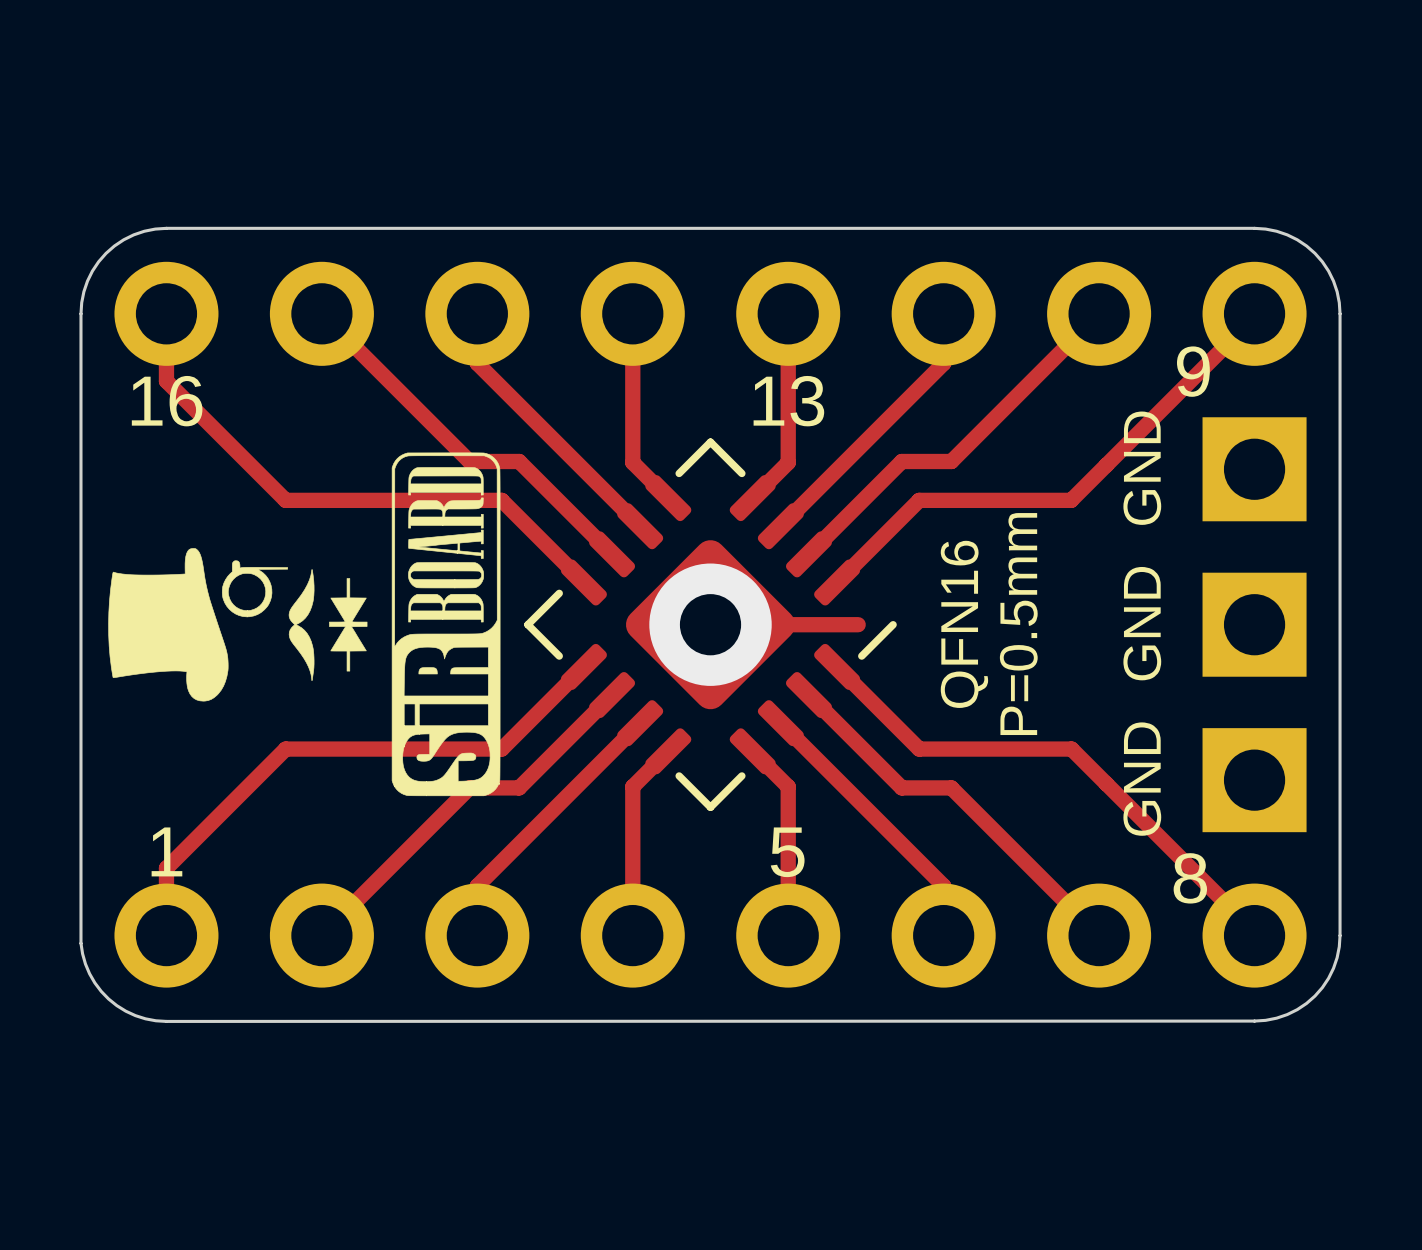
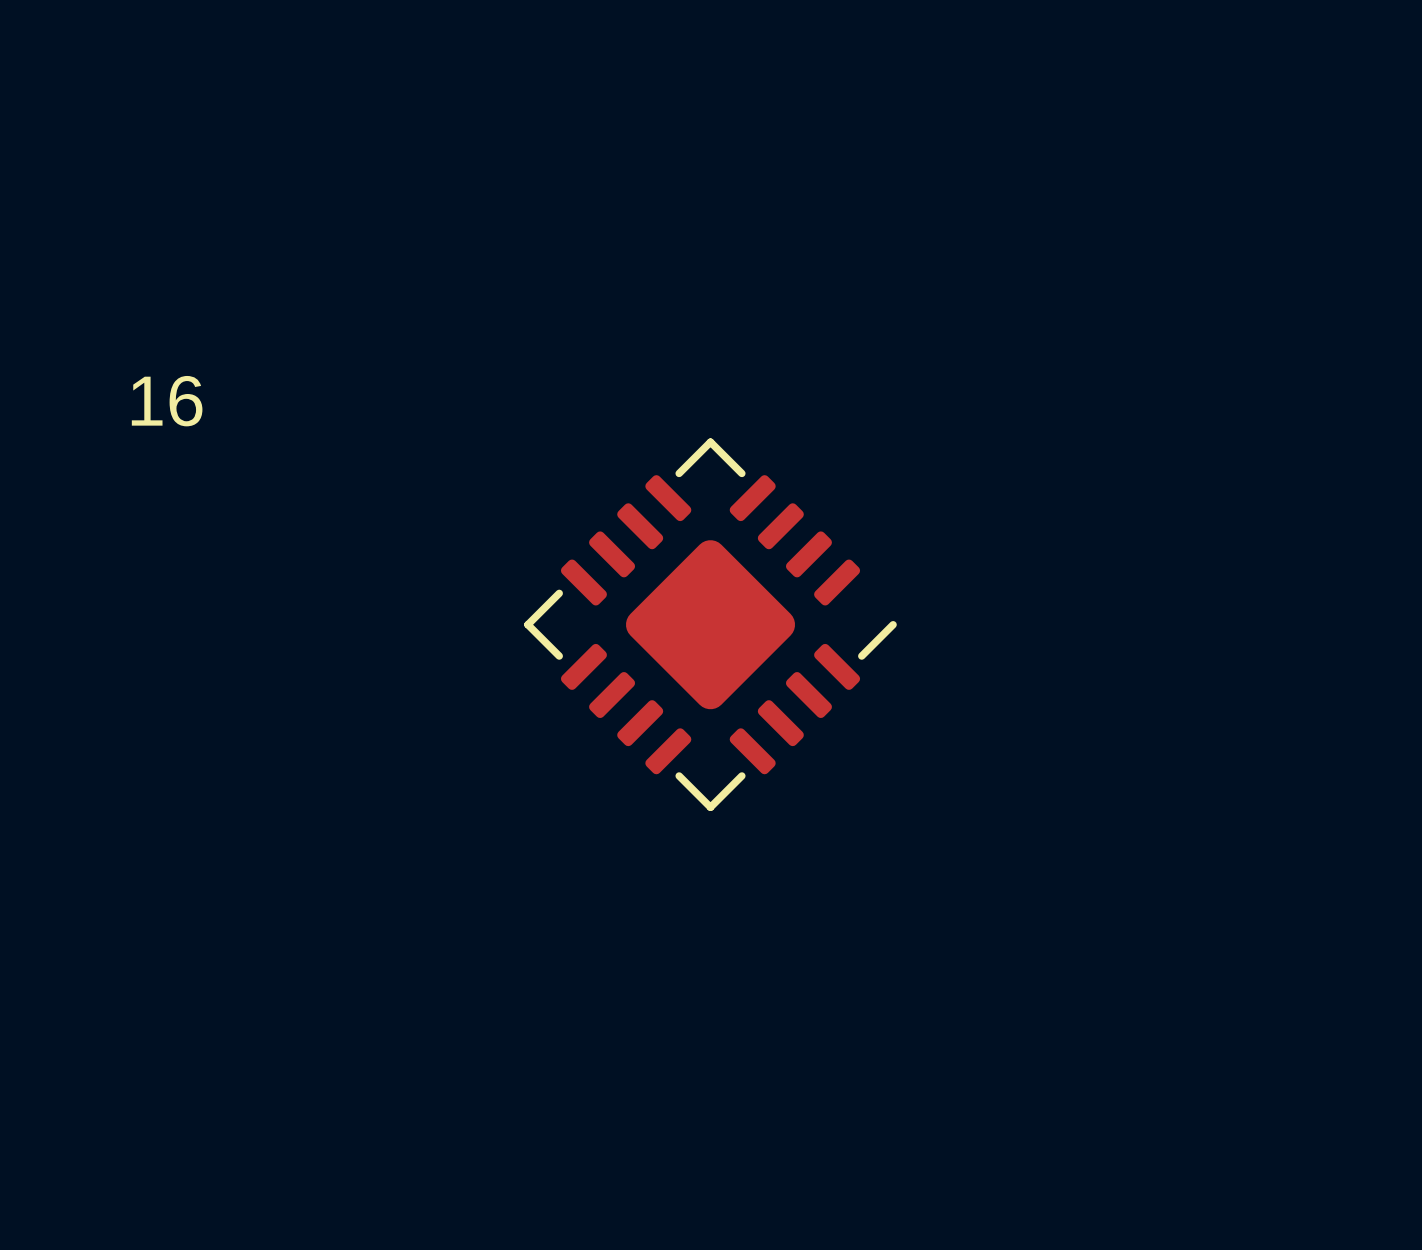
board edge: (166, 228) (1254, 228) (1276, 231) (1297, 239) (1315, 253) (1328, 271) (1337, 291) (1340, 313) (1340, 935) (1337, 957) (1328, 978) (1315, 996) (1297, 1009) (1276, 1018) (1254, 1021) (166, 1021) (135, 1015) (116, 1005) (101, 991) (89, 973) (80, 943) (80, 313) (87, 281) (106, 253) (133, 234) (166, 228) -> none
track: (166, 313) (166, 381) (285, 500) (501, 500) (583, 582) -> none
track: (321, 313) (469, 461) (519, 461) (612, 554) -> none
track: (477, 313) (477, 363) (640, 526) -> none
track: (632, 313) (632, 462) (668, 498) -> none
part: (710, 313) -> none
track: (788, 313) (788, 462) (752, 498) -> none
track: (943, 313) (943, 363) (780, 526) -> none
track: (1099, 313) (951, 461) (901, 461) (808, 554) -> none
track: (1225, 345) (1071, 500) (919, 500) (837, 582) -> none
text: 9 (1193, 371) -> none
text: 13 (788, 401) -> none
drawing: [108, 452, 501, 797] -> none
text: GND (1142, 468) -> none
text: GND (1142, 623) -> none
track: (710, 624) (858, 624) -> none
via: (710, 624) -> none
text: QFN16 (964, 624) -> none
text: P=0.5mm (1018, 624) -> none
part: (1254, 624) -> none
track: (583, 666) (501, 749) (285, 749) (166, 868) (166, 935) -> none
track: (837, 666) (919, 749) (1071, 749) (1225, 903) -> none
track: (612, 695) (519, 787) (469, 787) (321, 935) -> none
track: (808, 695) (901, 787) (951, 787) (1099, 935) -> none
track: (640, 723) (477, 885) (477, 935) -> none
track: (780, 723) (943, 885) (943, 935) -> none
track: (668, 751) (632, 786) (632, 935) -> none
track: (752, 751) (788, 786) (788, 935) -> none
text: GND (1142, 779) -> none
text: 1 (166, 851) -> none
text: 5 (787, 852) -> none
text: 8 (1190, 878) -> none
part: (710, 935) -> none

